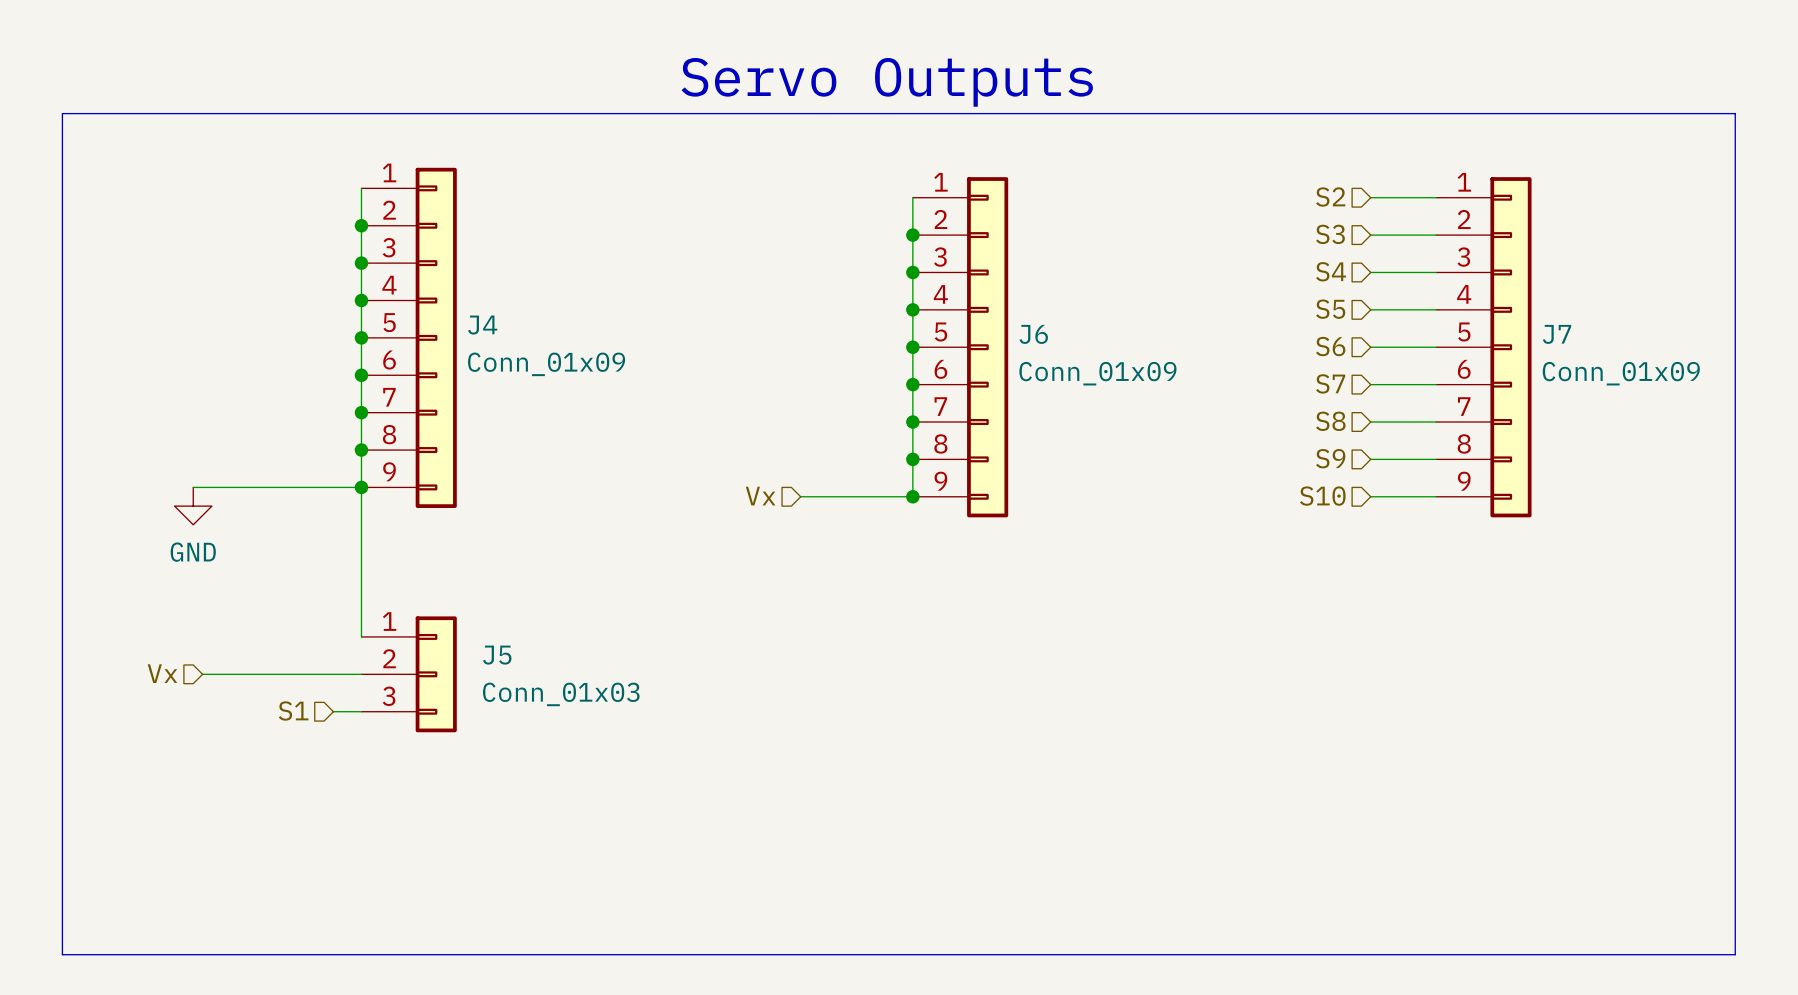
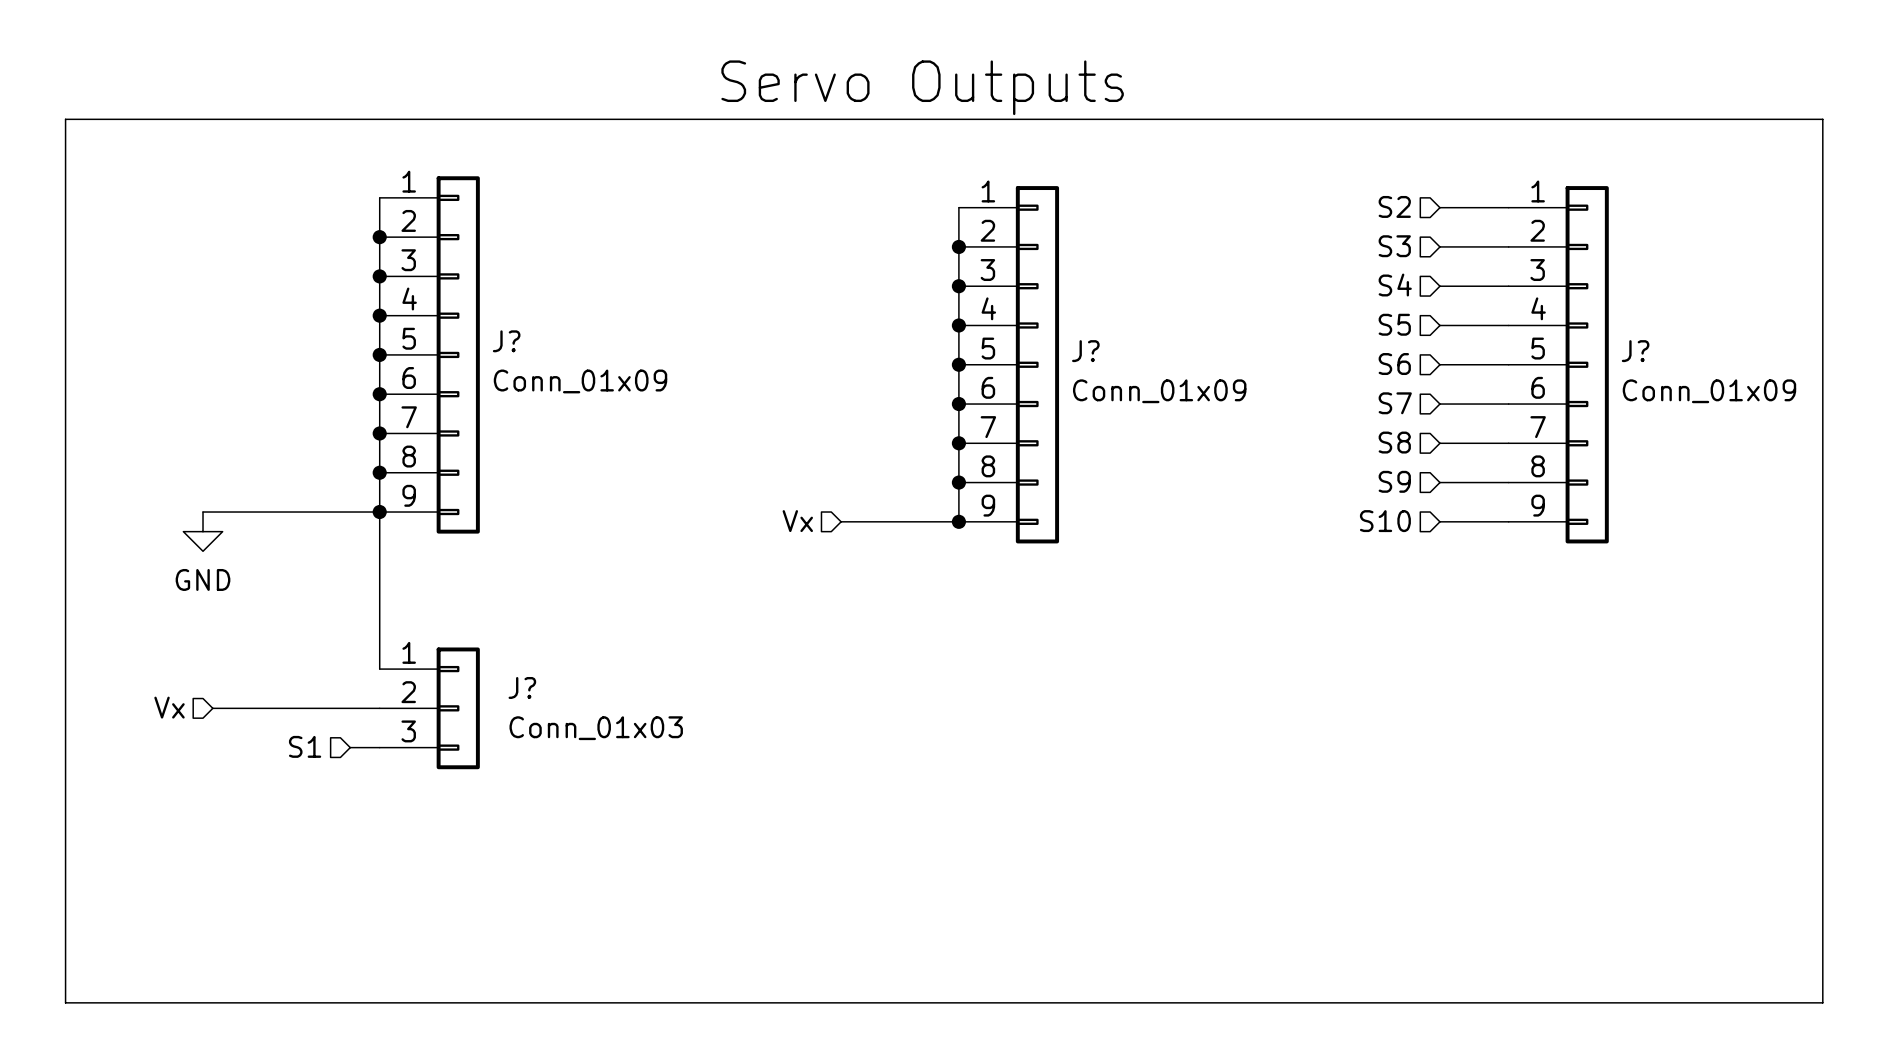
J4 name: J4 (482, 325) -> J? (506, 341)
J6 name: J6 (1033, 334) -> J? (1085, 351)
J7 name: J7 (1557, 334) -> J? (1635, 351)
J5 name: J5 (497, 655) -> J? (522, 687)

